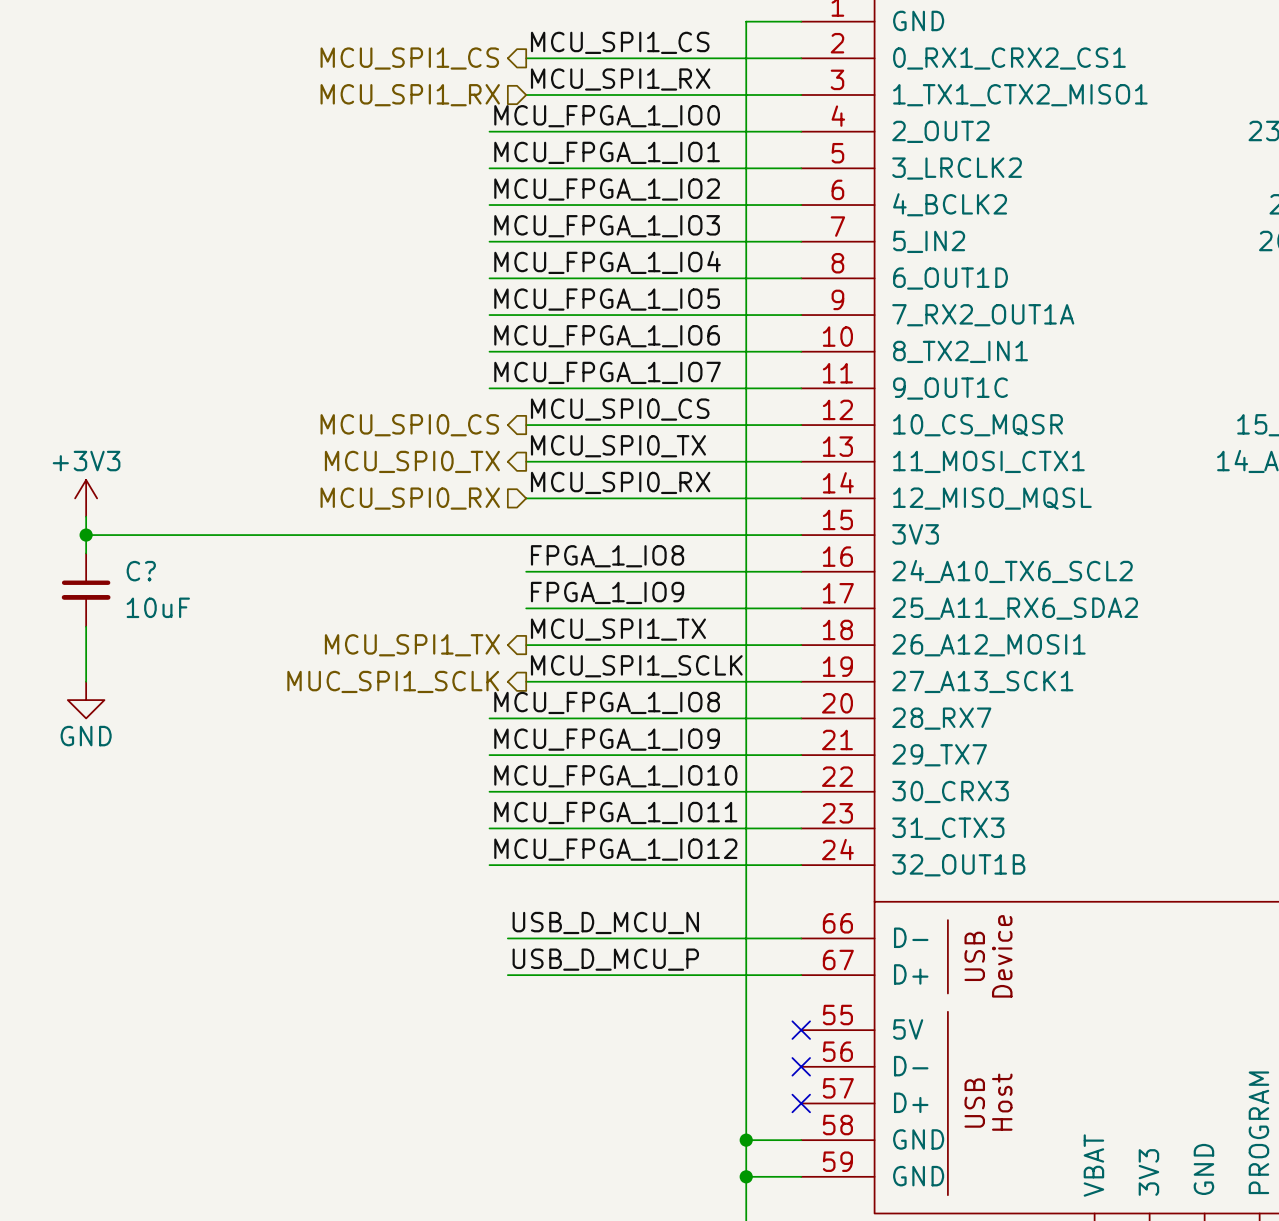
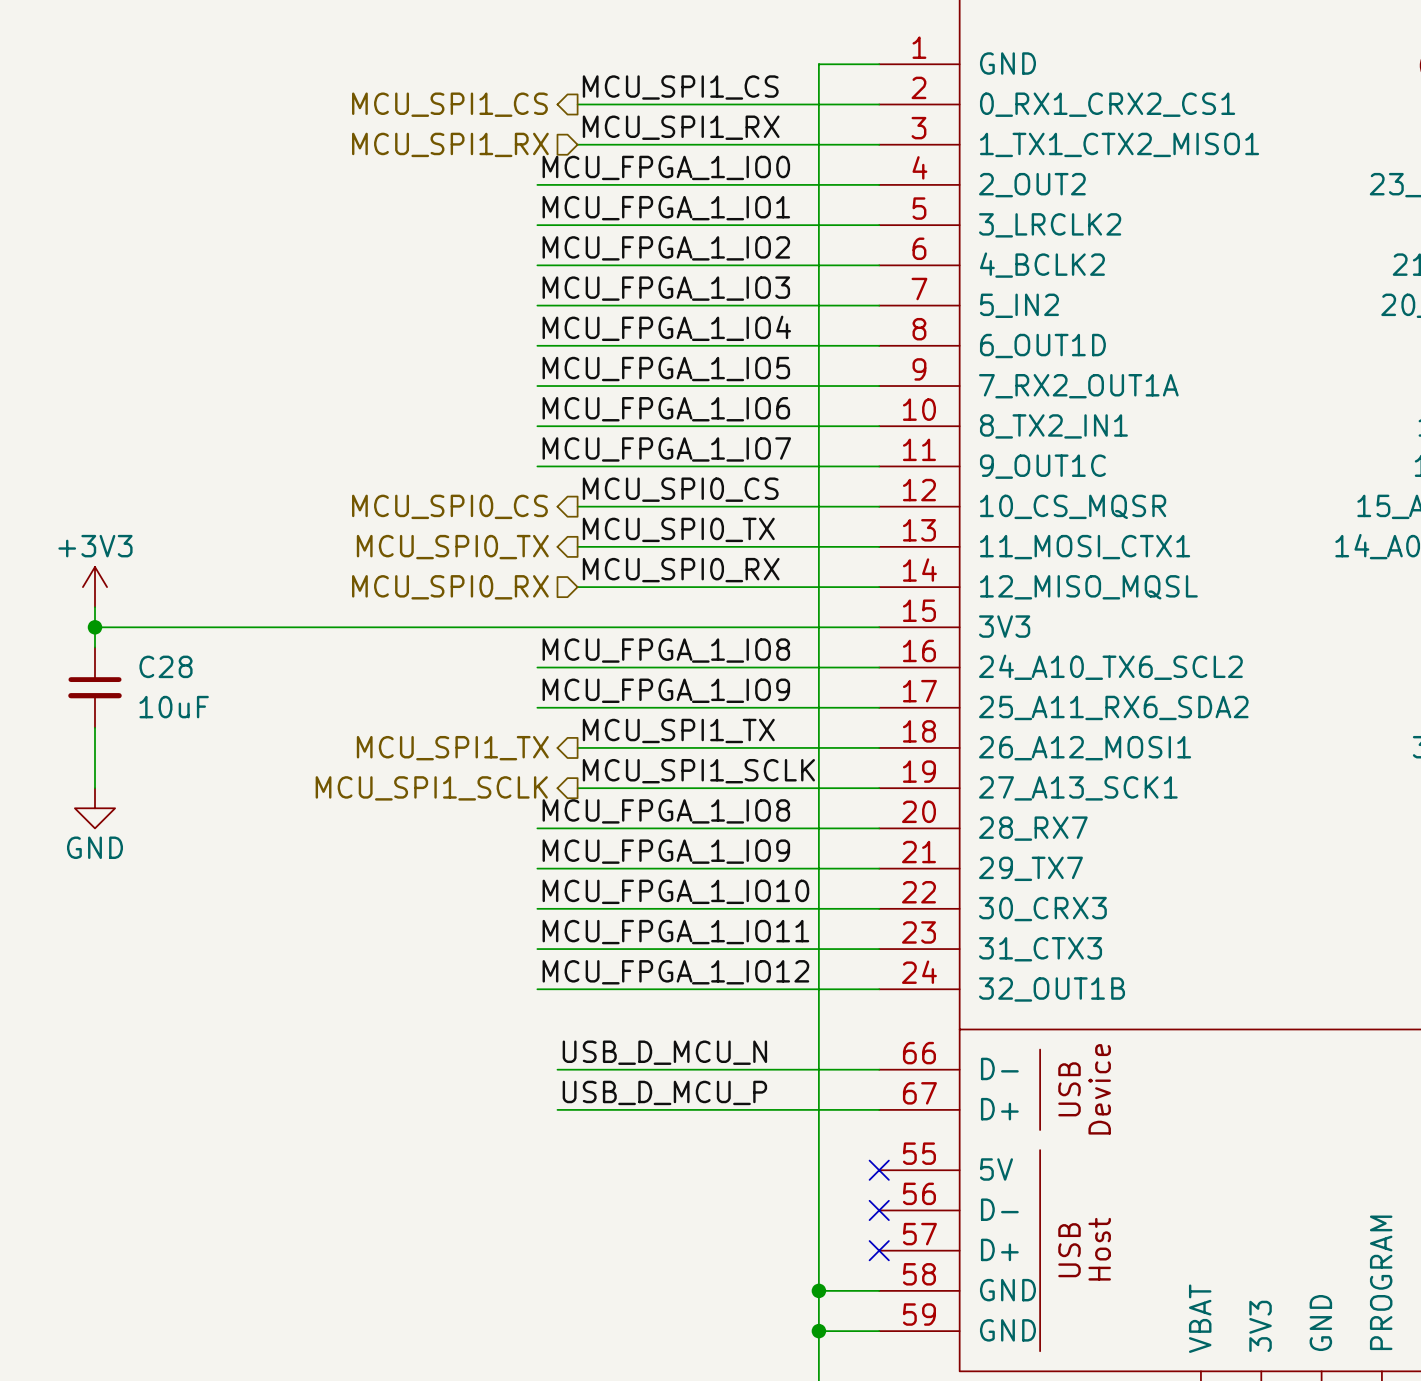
label: FPGA_1_IO8 (607, 556) -> none
label: none -> MCU_FPGA_1_IO8 (666, 650)
C? name: C? (141, 571) -> C28 (166, 666)
wire: none -> (537, 667) (577, 667)
label: FPGA_1_IO9 (607, 592) -> none
label: none -> MCU_FPGA_1_IO9 (666, 690)
wire: none -> (537, 707) (577, 707)
hierarchical label: MUC_SPI1_SCLK (393, 681) -> MCU_SPI1_SCLK (431, 788)

